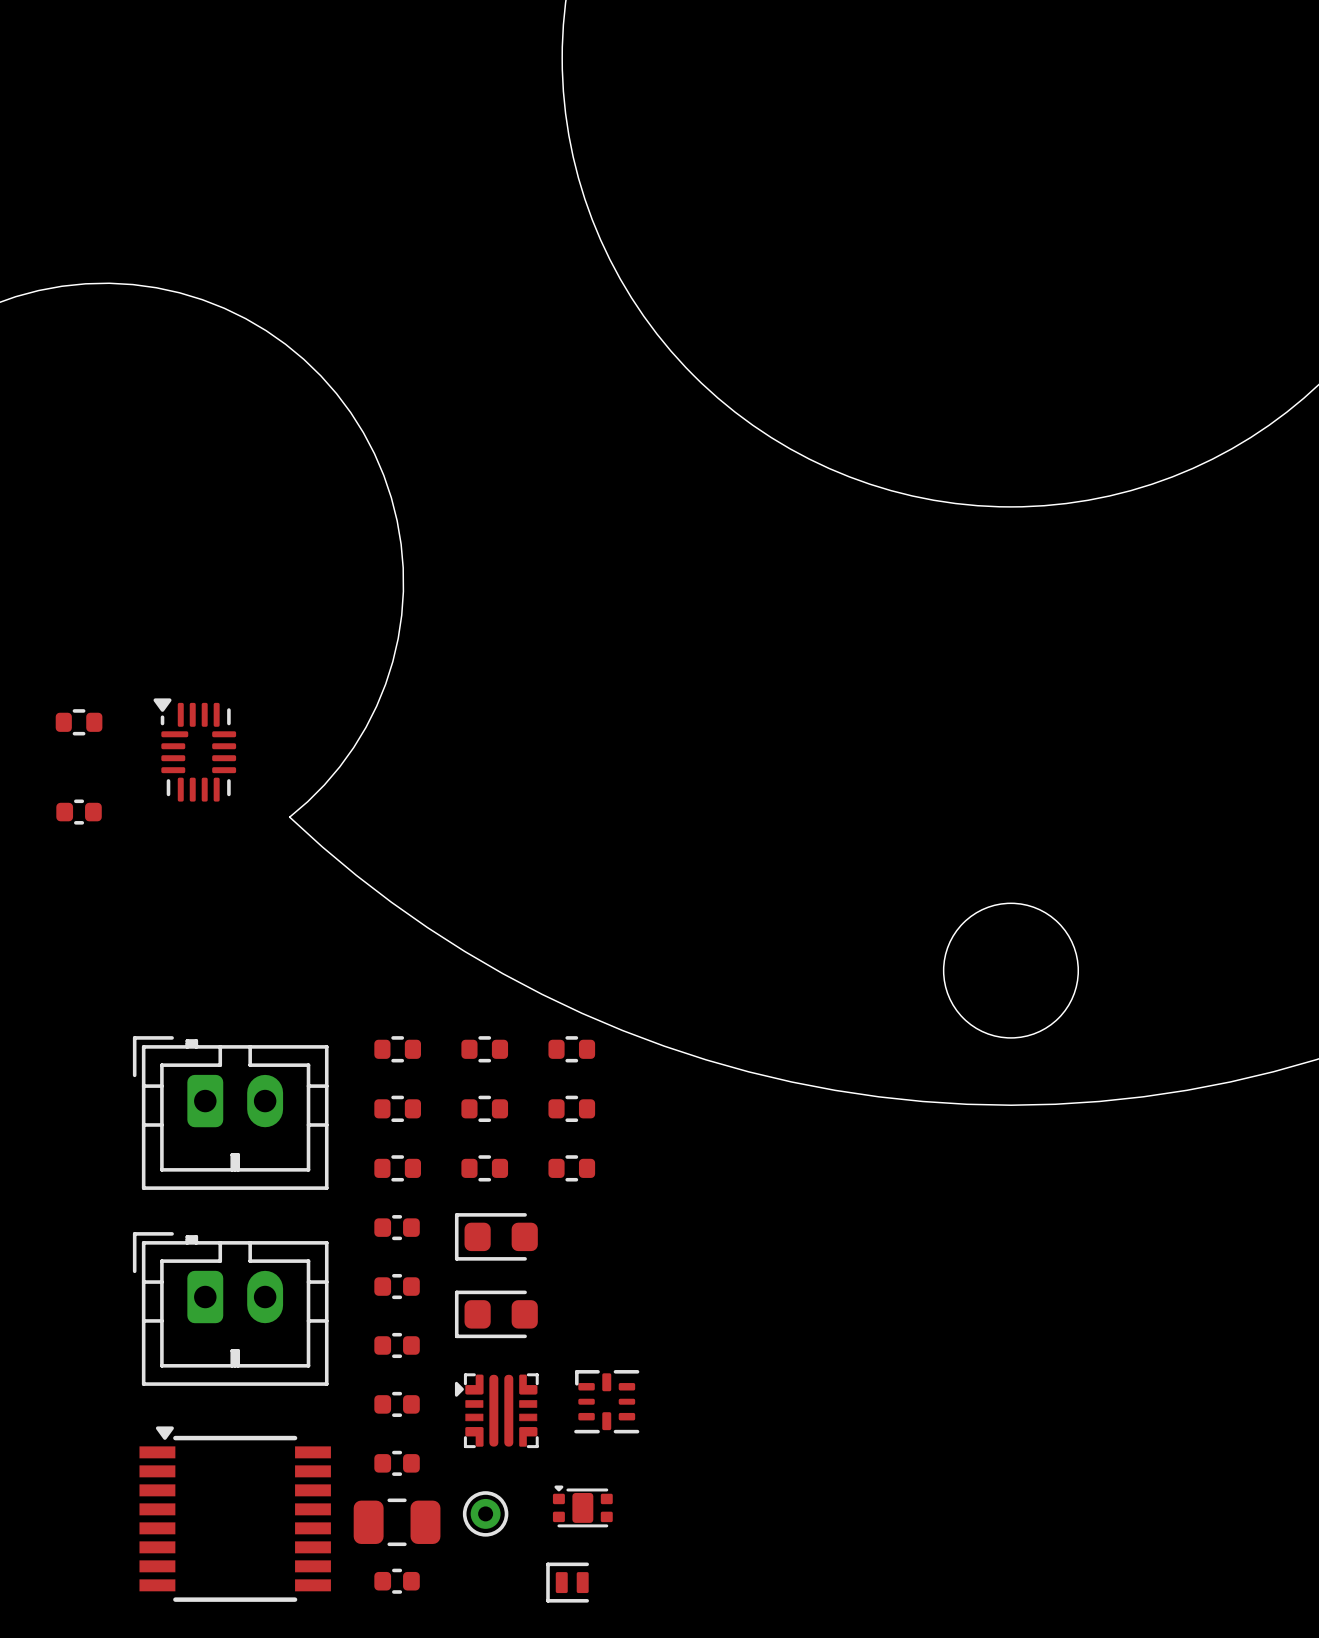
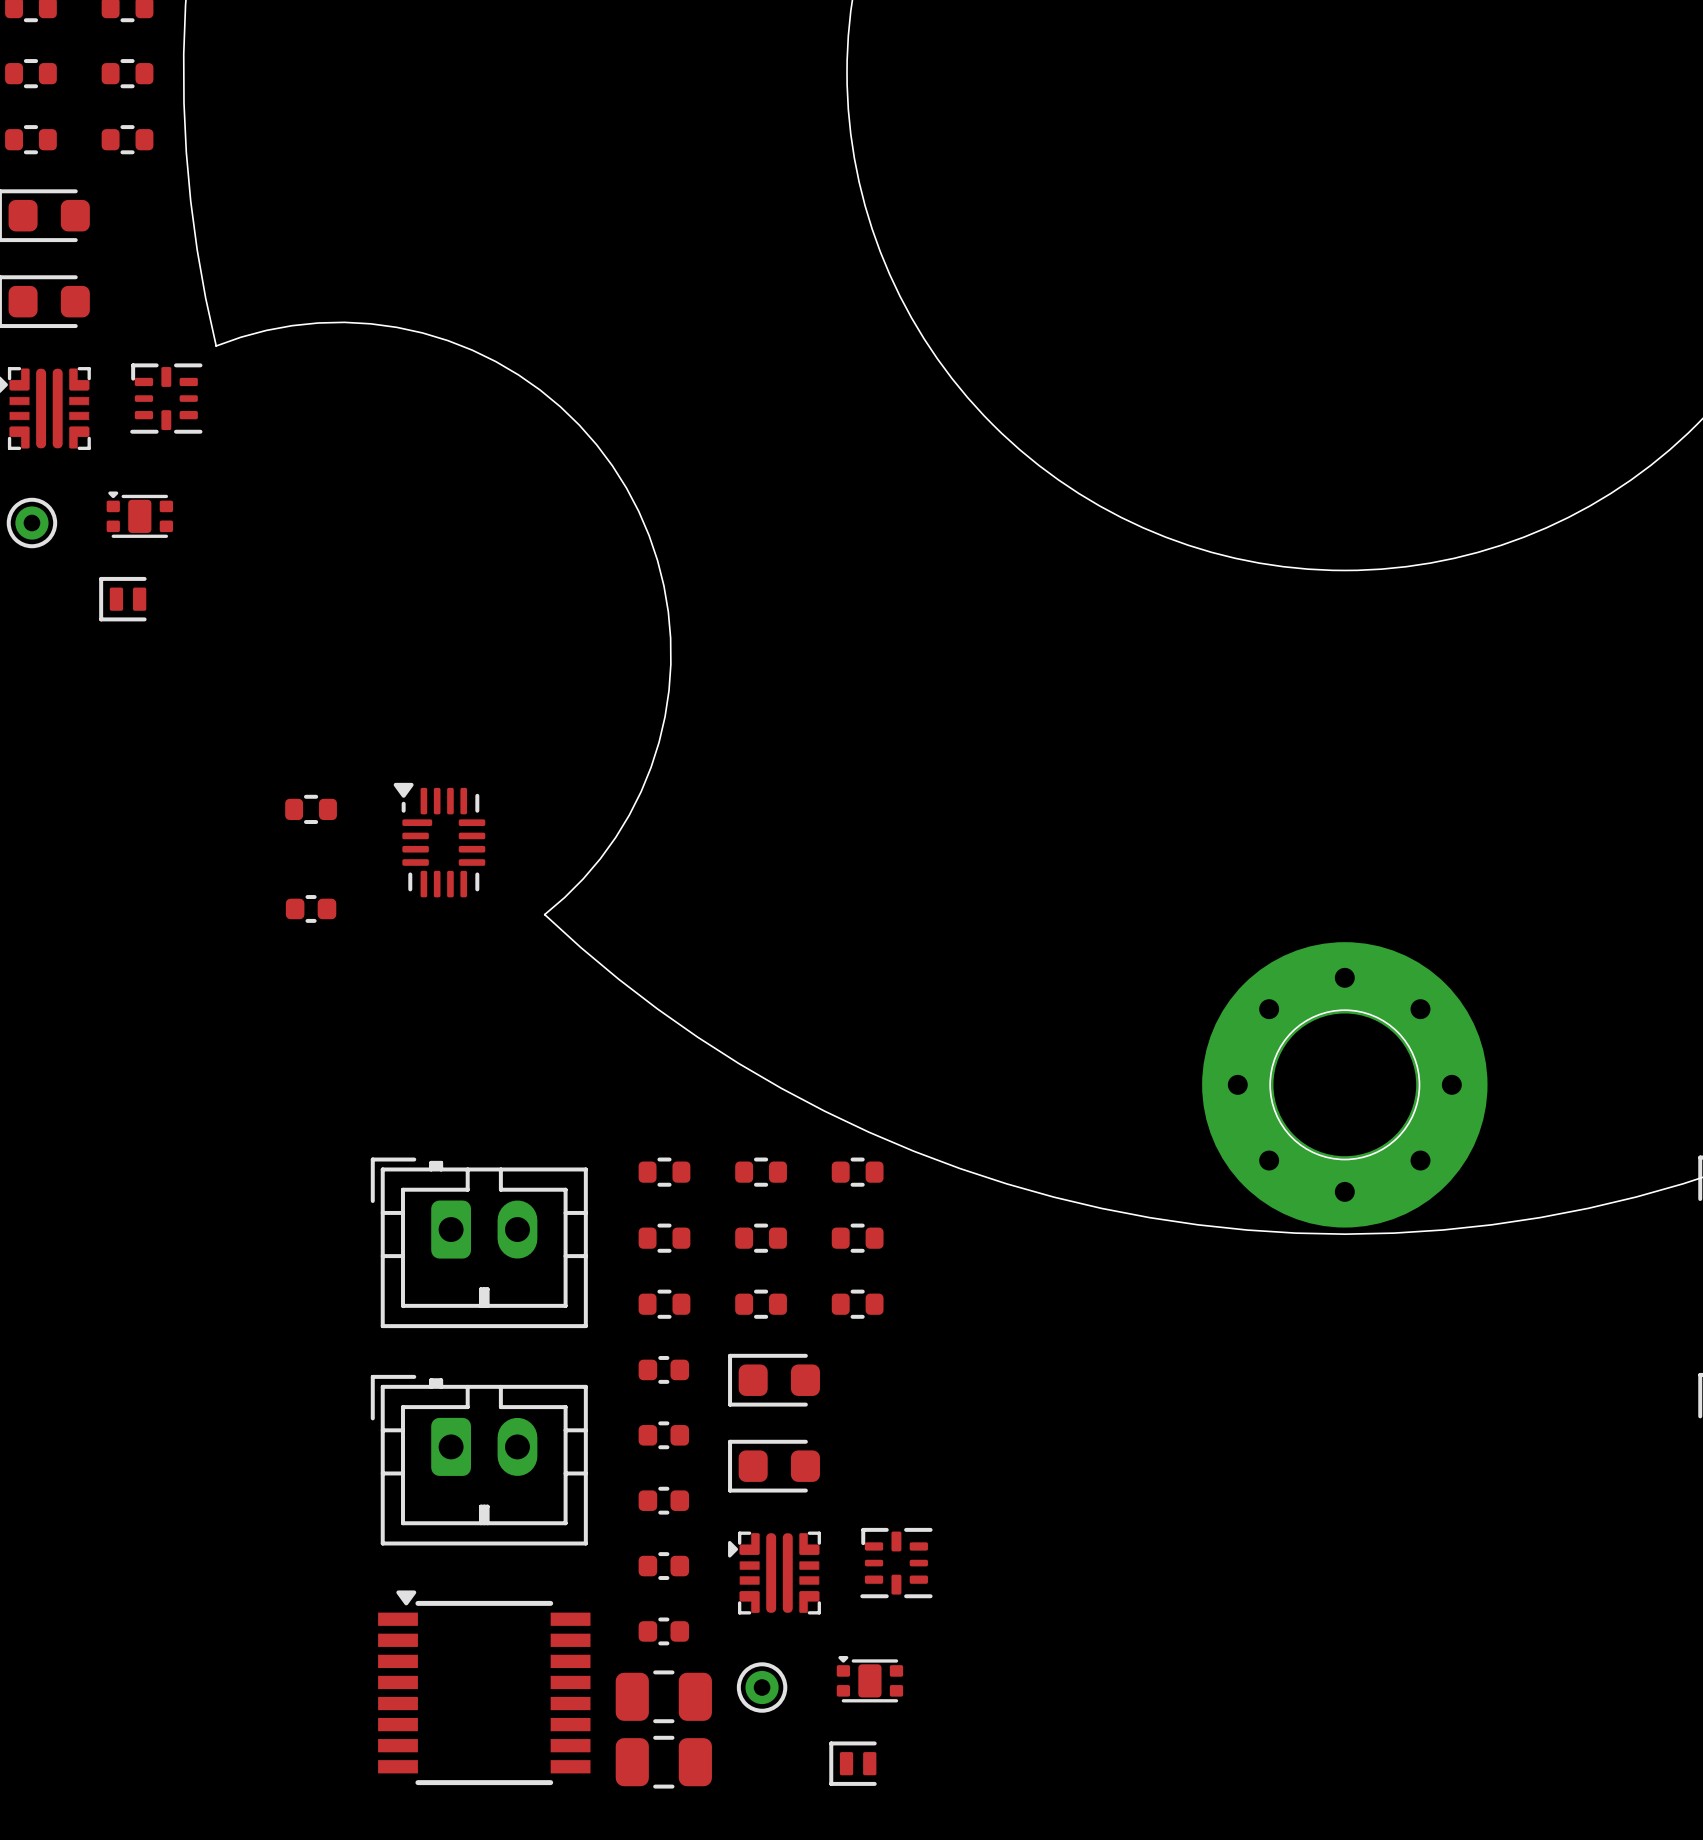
part: none -> (1344, 1084)
part footprint: [374, 1568, 420, 1594] -> [615, 1735, 712, 1789]

